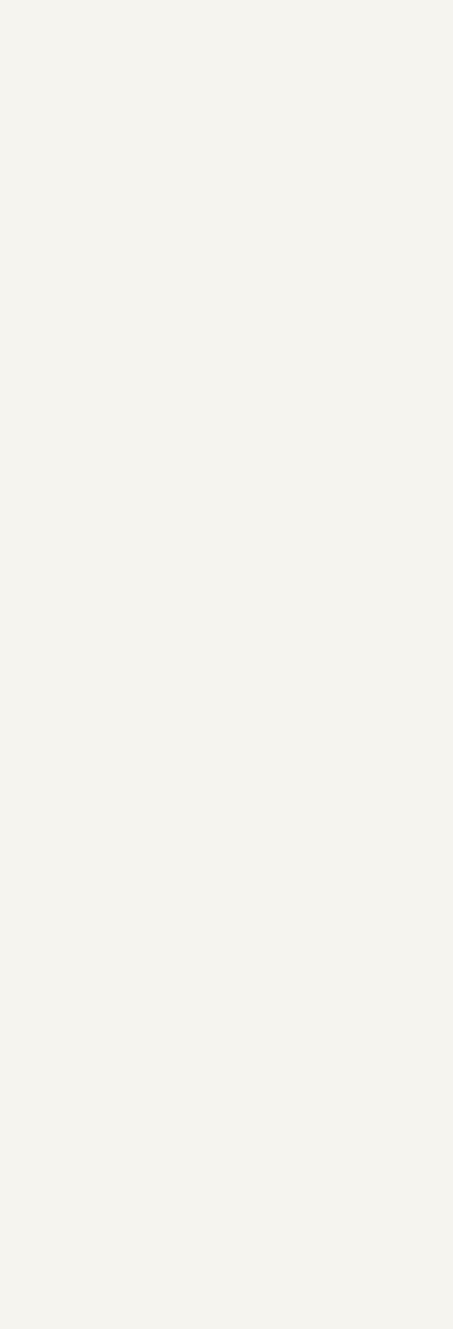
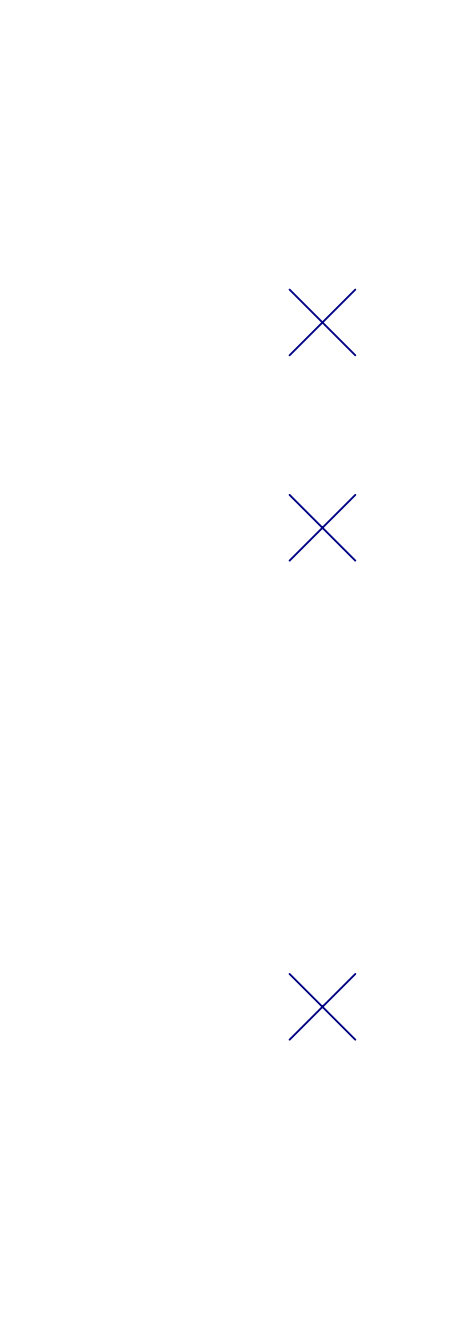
no-connect mark: none -> (322, 322)
no-connect mark: none -> (322, 527)
no-connect mark: none -> (322, 1006)

